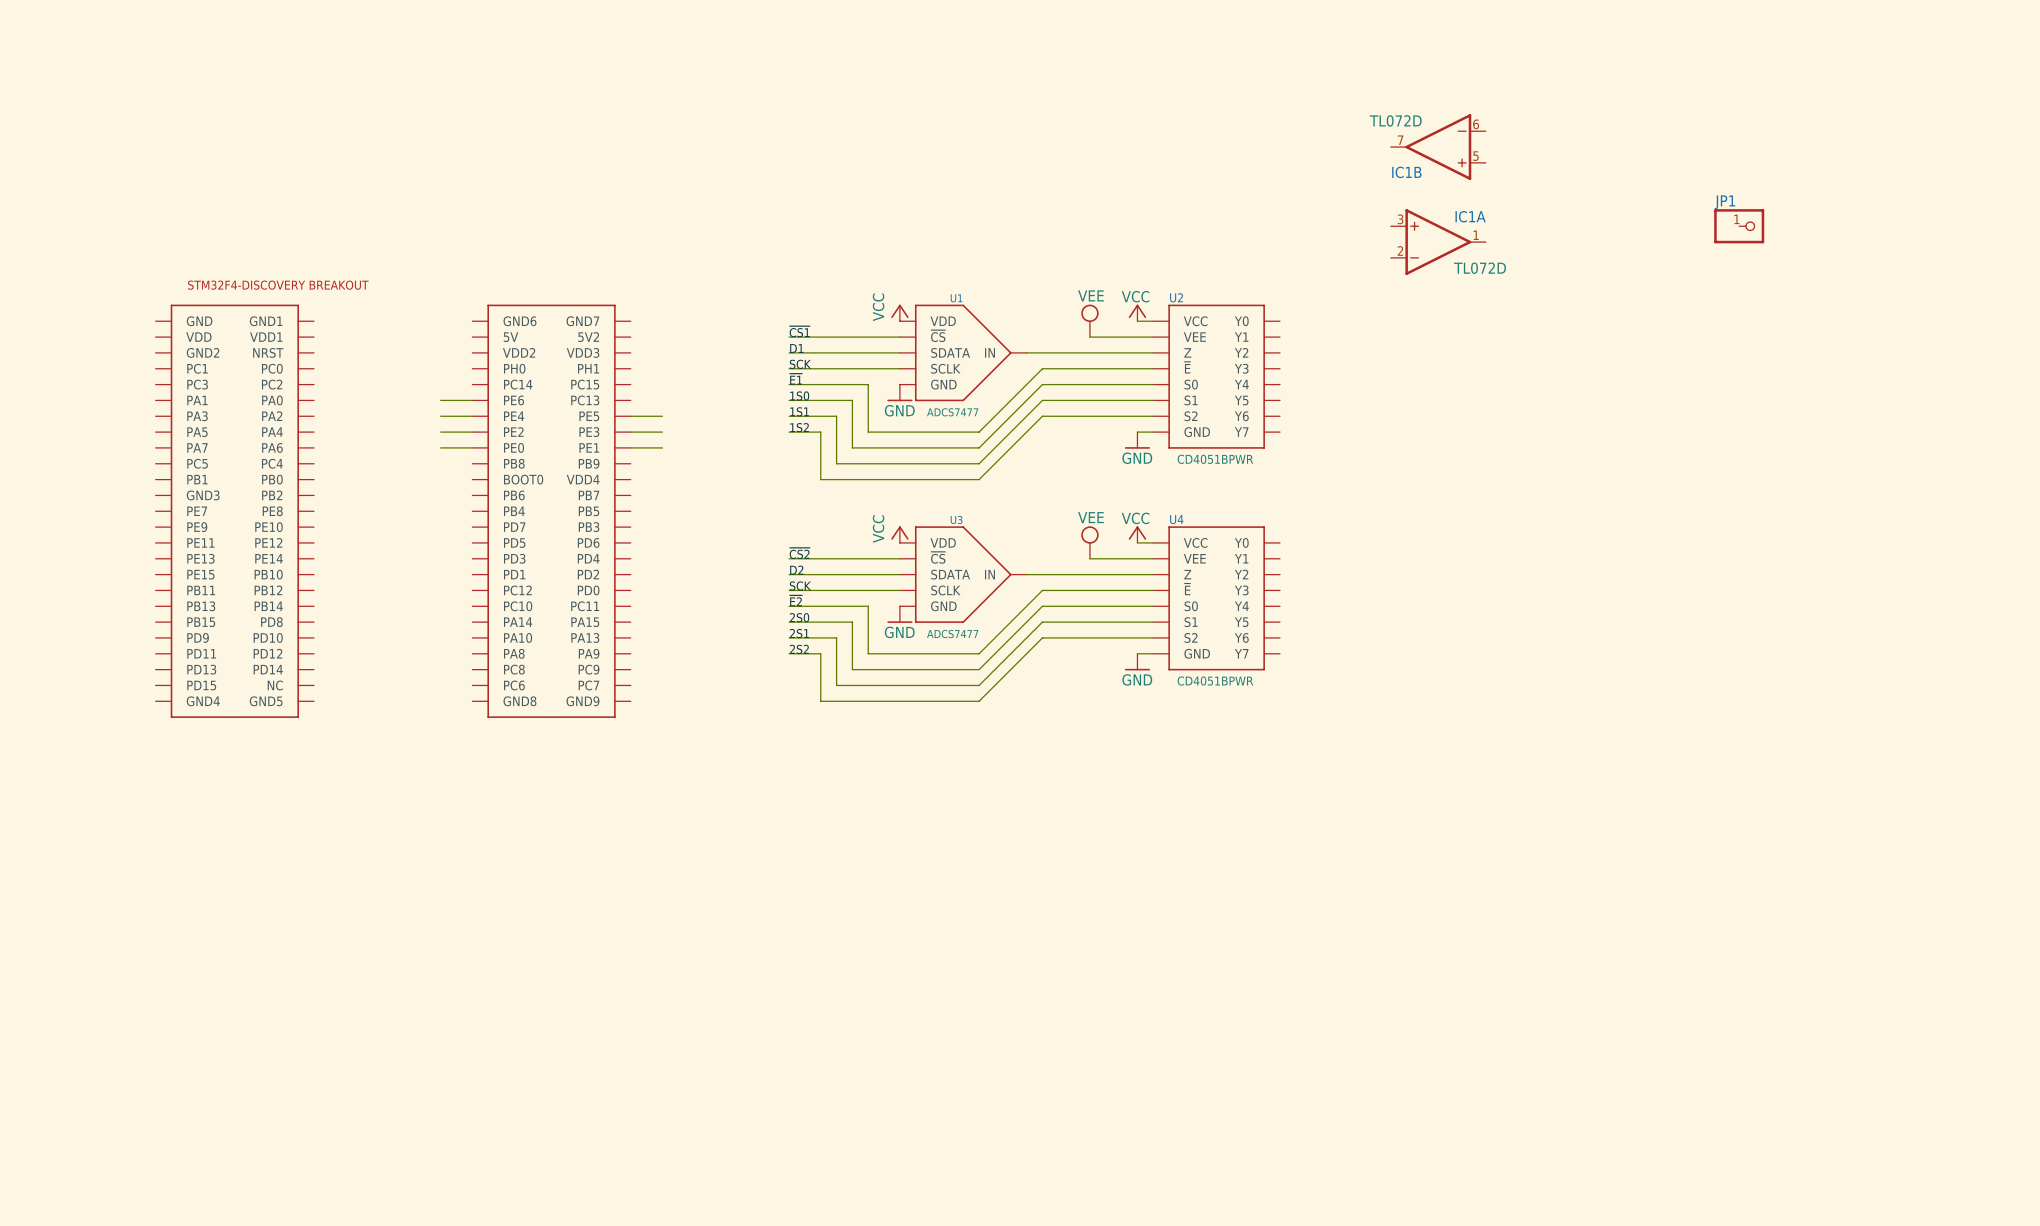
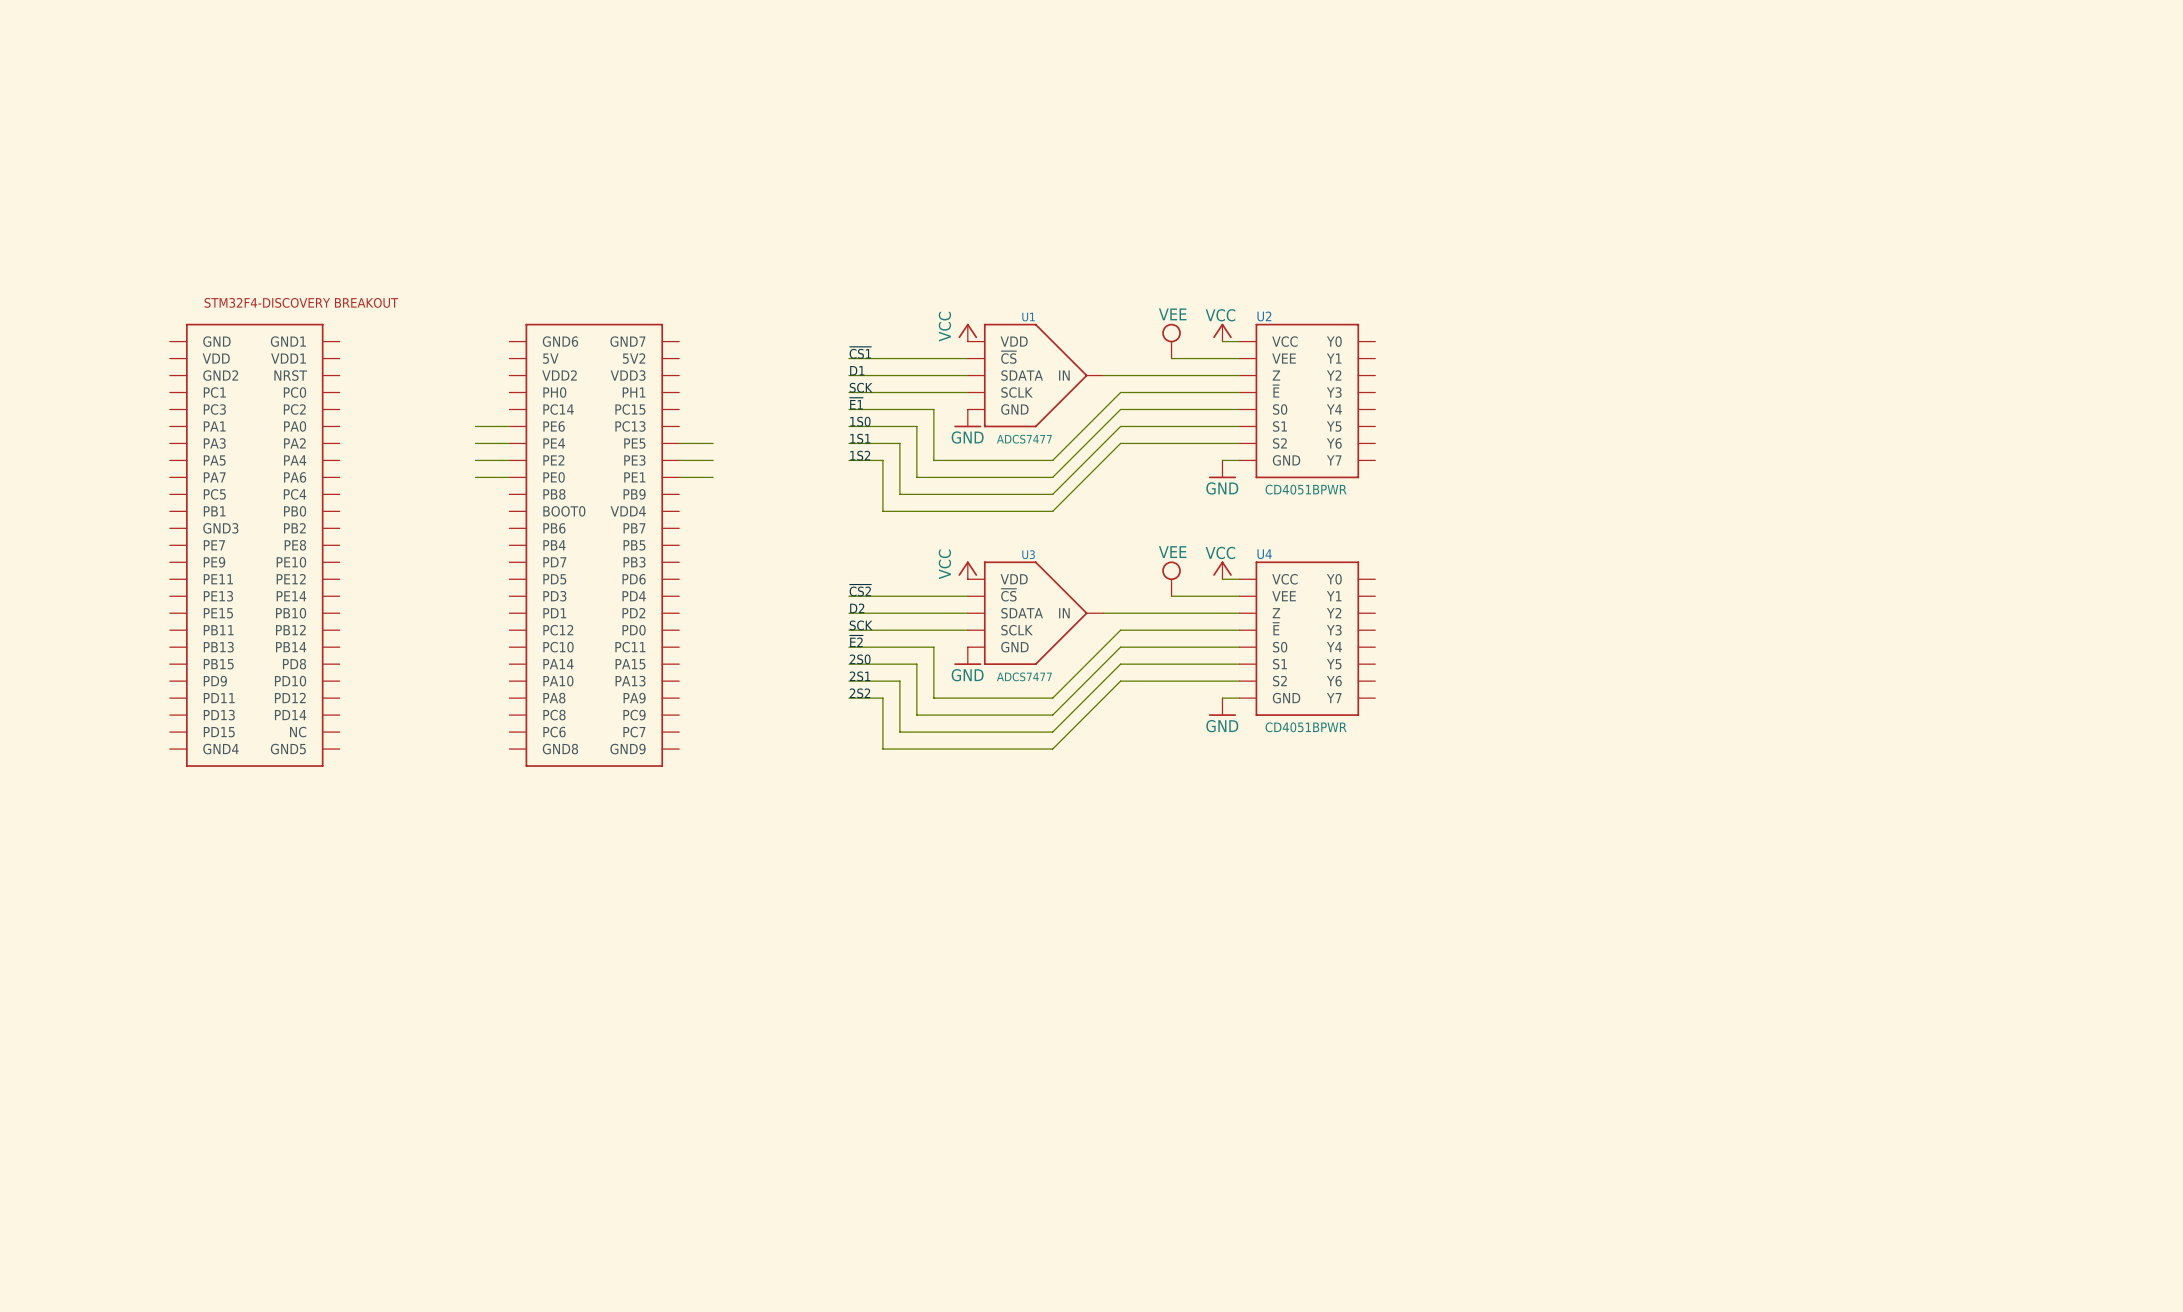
IC1B: TL072D (1438, 147) -> none
JP1: (1739, 226) -> none
IC1A: TL072D (1438, 242) -> none

